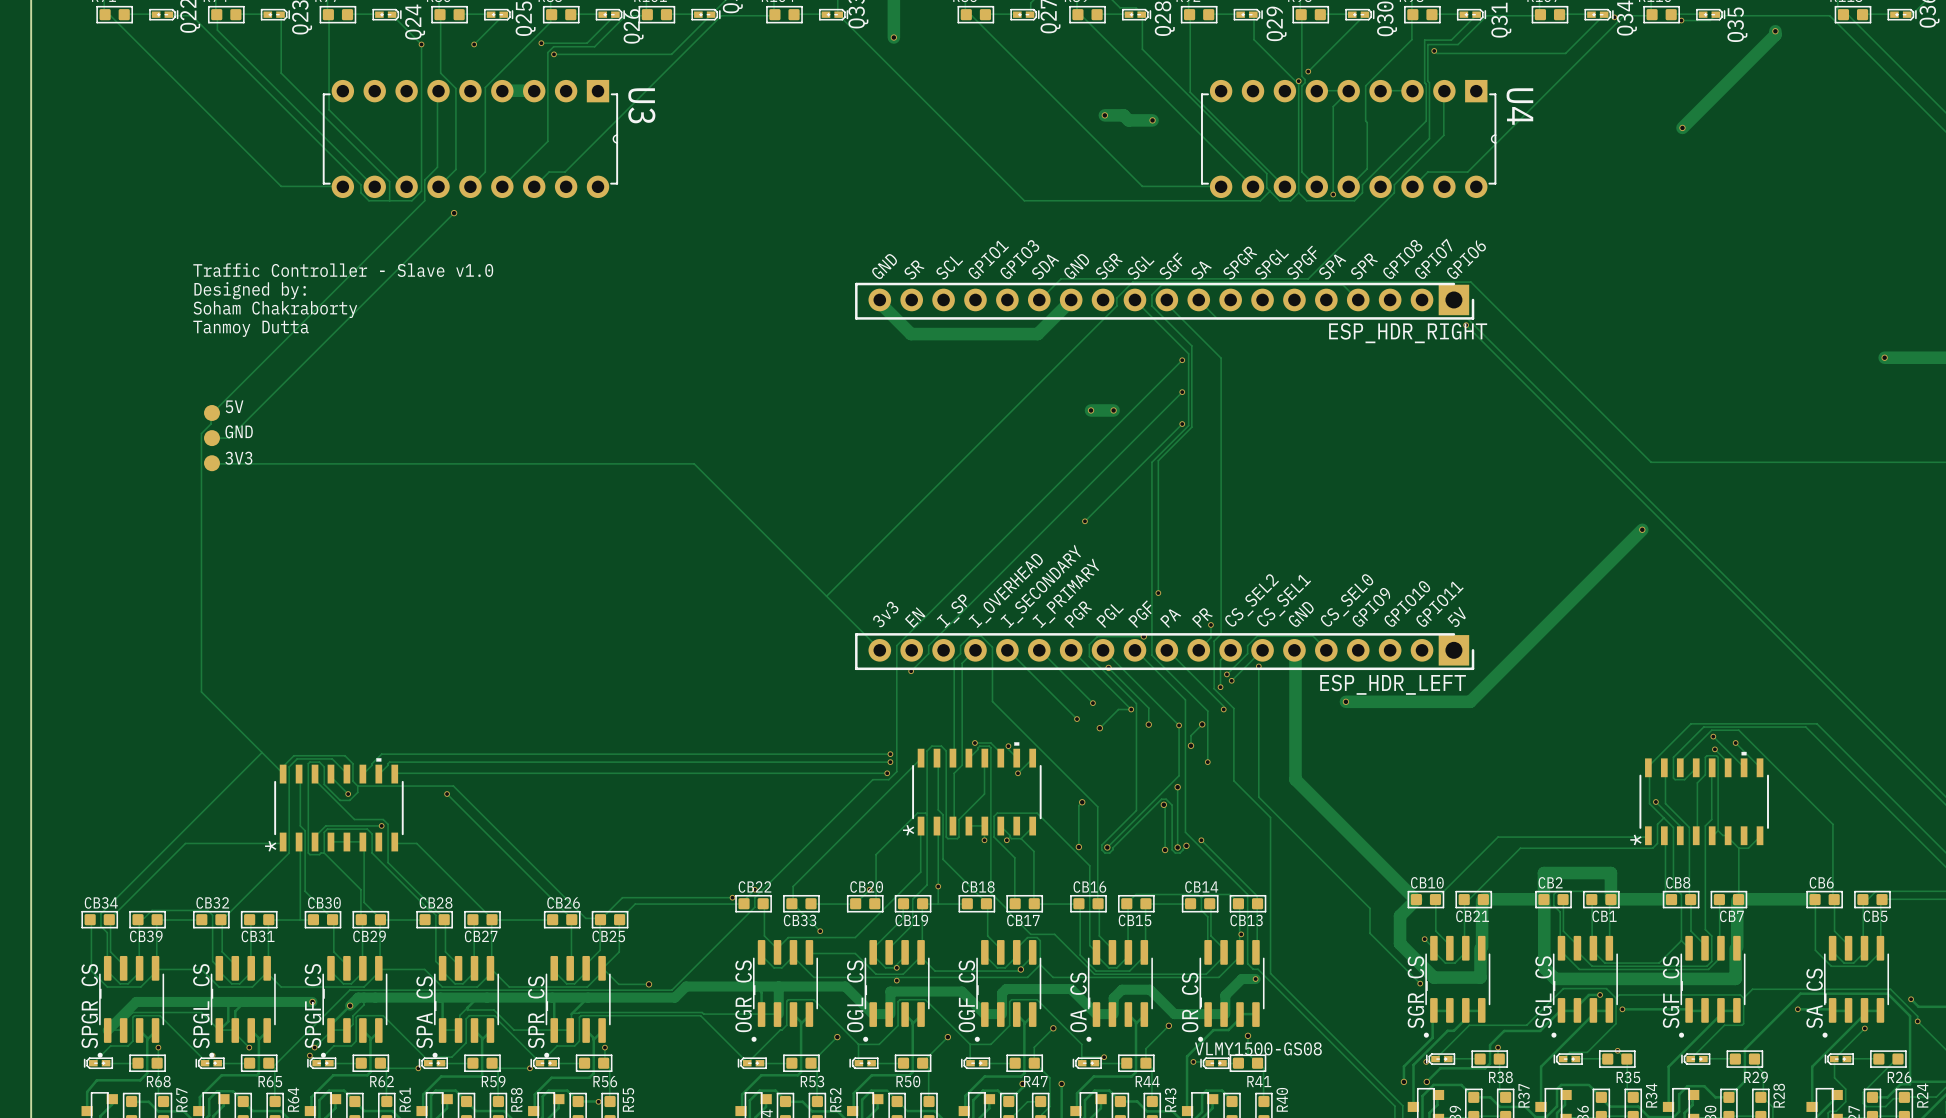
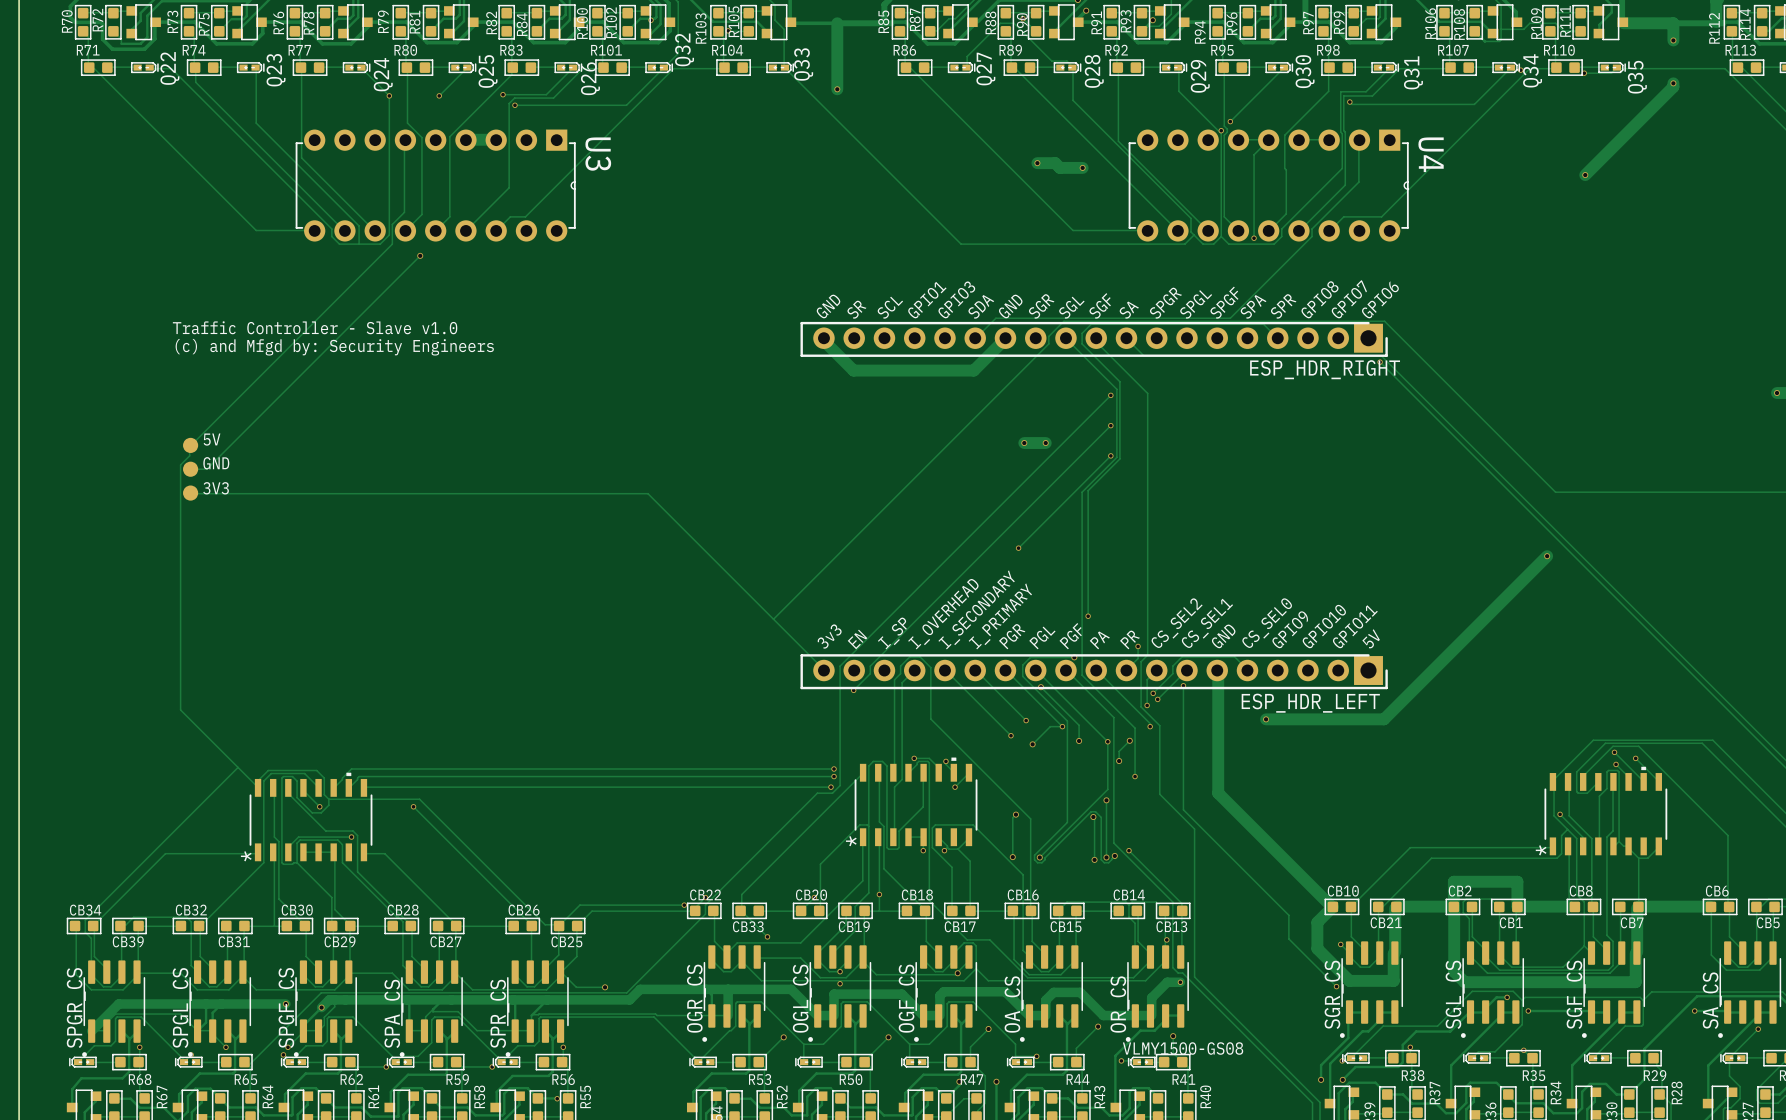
text: Traffic Controller - Slave v1.0 (343, 270) -> none
text: Designed by: (250, 290) -> Traffic Controller - Slave v1.0 (315, 327)
text: Soham Chakraborty (275, 309) -> (c) and Mfgd by: Security Engineers (334, 347)
text: Tanmoy Dutta (250, 328) -> none

